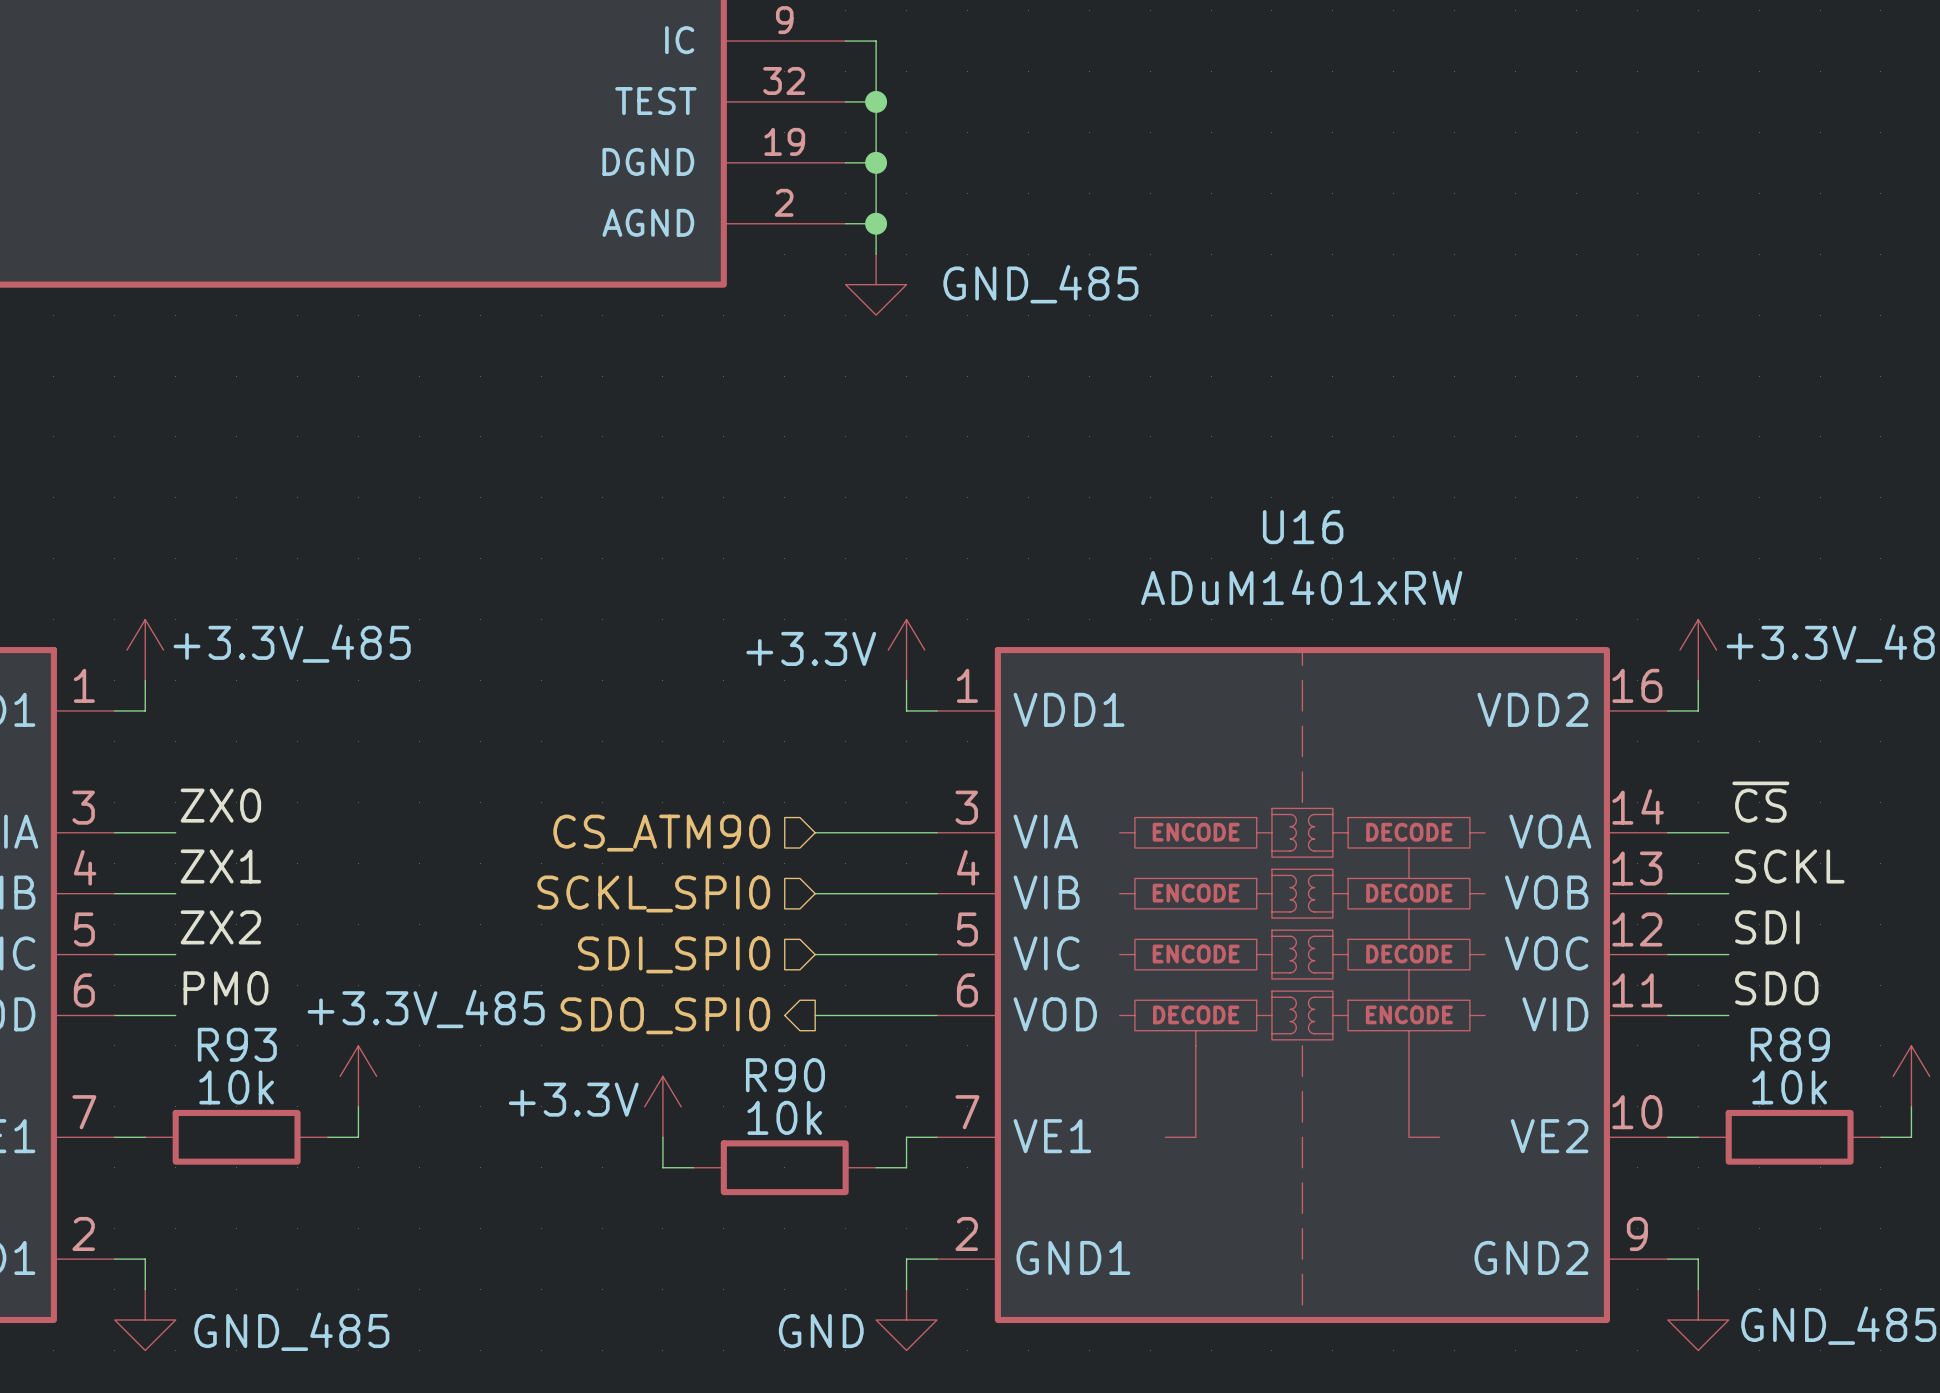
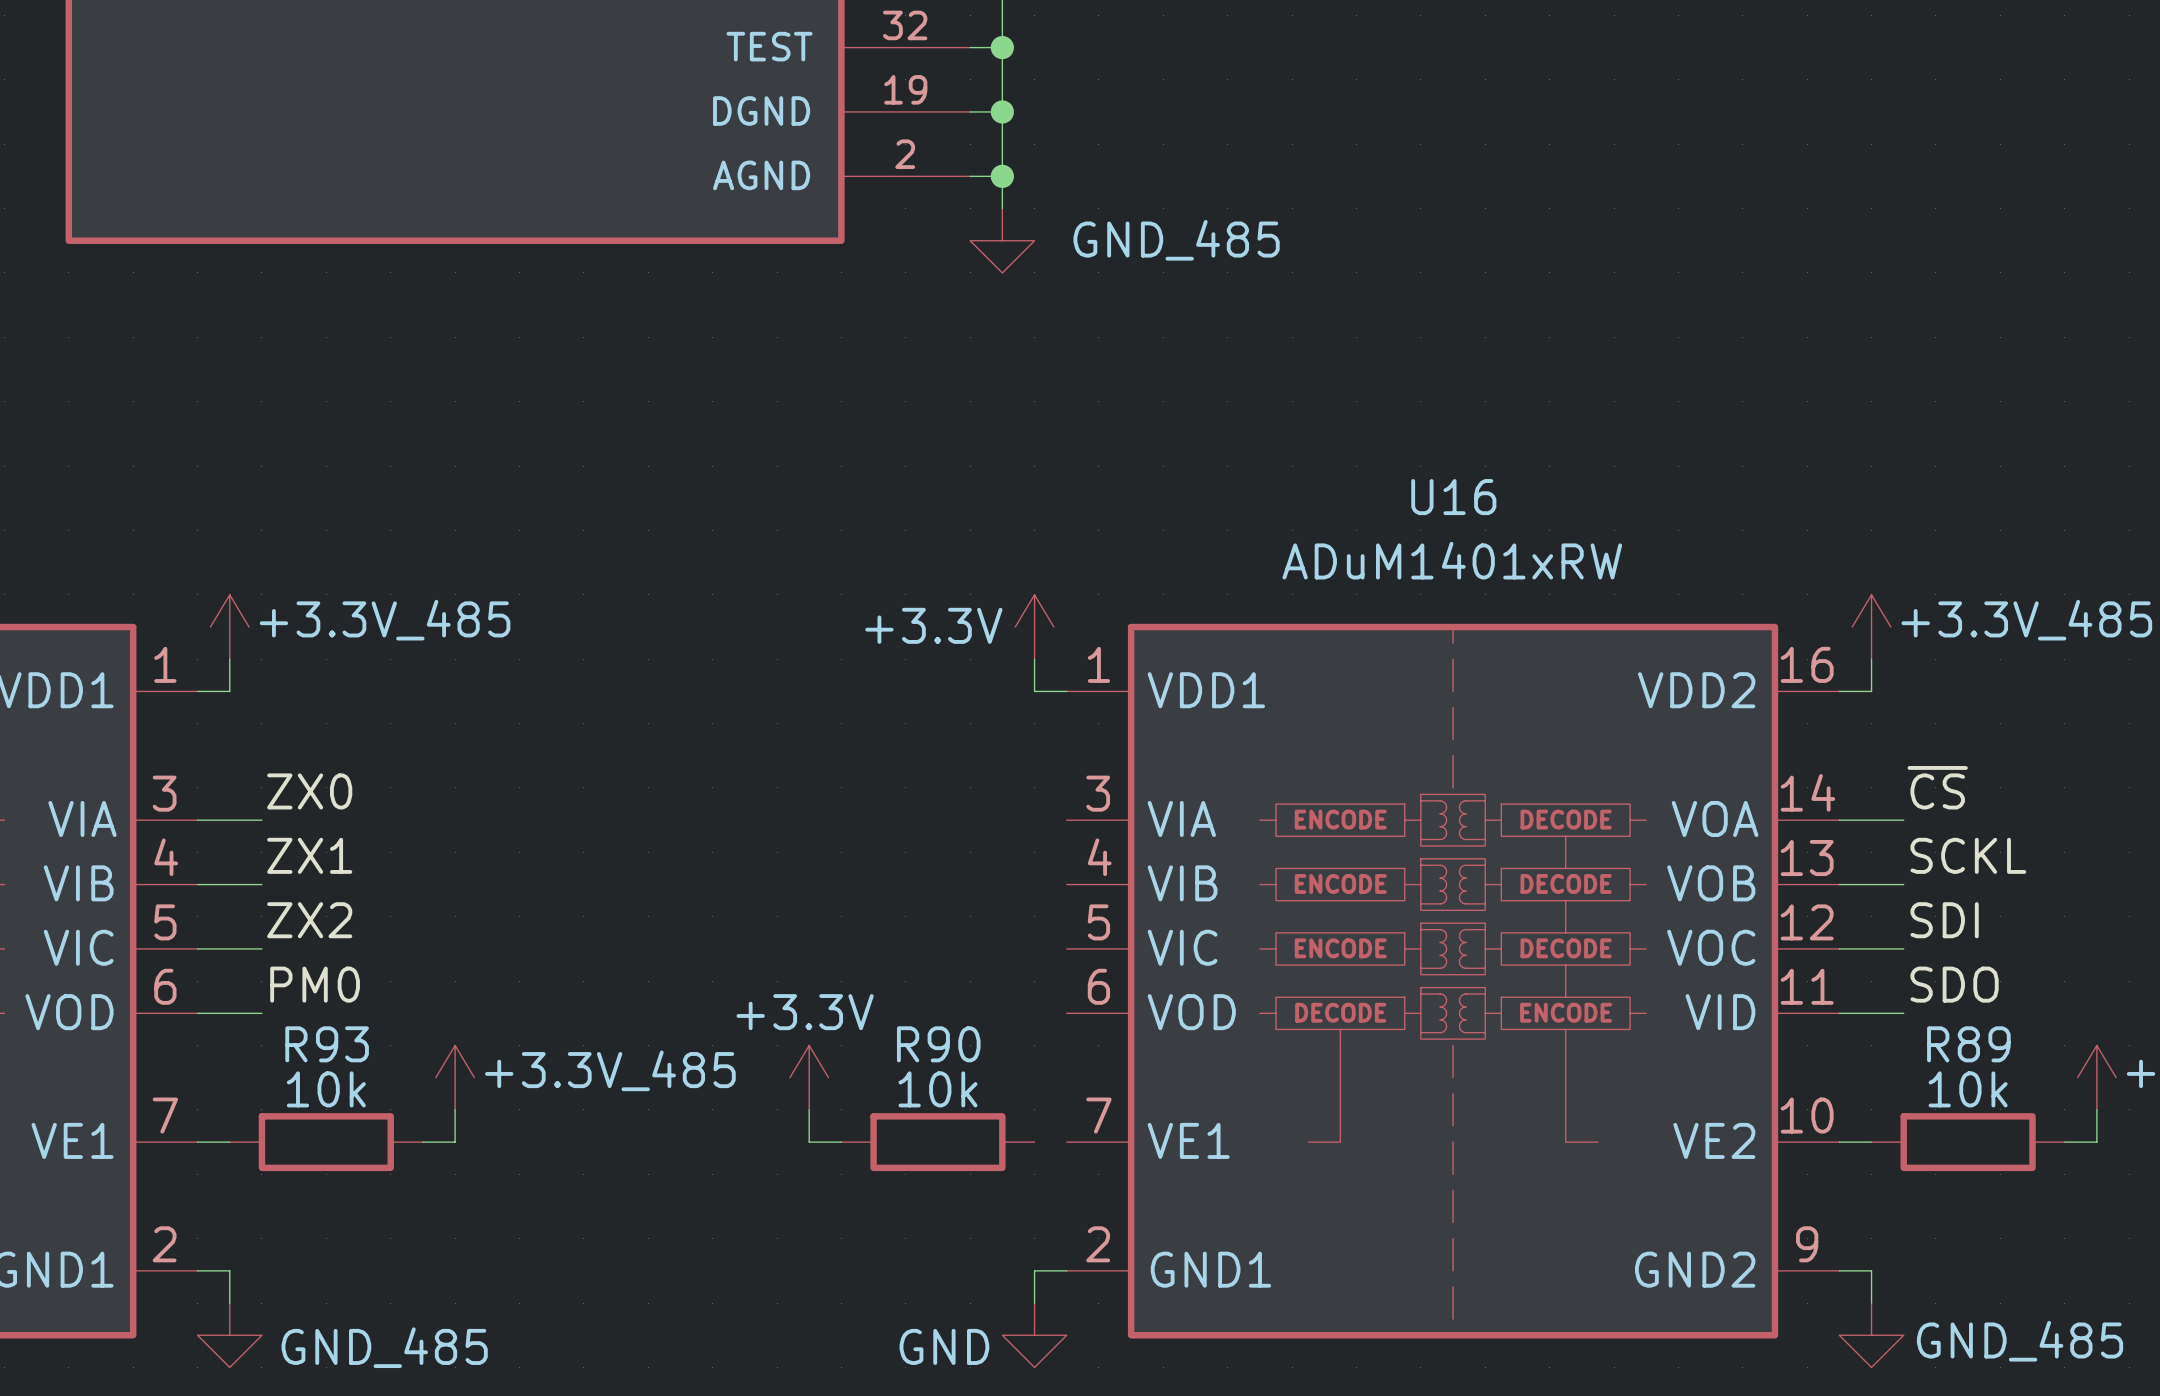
wire: (815, 832) (936, 832) -> none
hierarchical label: CS_ATM90 (661, 833) -> none
hierarchical label: SCKL_SPI0 (653, 893) -> none
wire: (815, 893) (936, 893) -> none
hierarchical label: SDI_SPI0 (674, 954) -> none
wire: (815, 954) (936, 954) -> none
power symbol text position: +3.3V_485 (426, 1008) -> +3.3V_485 (610, 1070)
hierarchical label: SDO_SPI0 (665, 1015) -> none
wire: (815, 1015) (936, 1015) -> none
power symbol text position: +3.3V (573, 1099) -> +3.3V (805, 1012)
power symbol position: +3.3V (662, 1106) -> +3.3V (809, 1077)
wire: (662, 1137) (662, 1167) (693, 1167) -> (809, 1109) (809, 1142) (841, 1142)
wire: (936, 1137) (906, 1137) (906, 1167) (876, 1167) -> none
R90 position: (784, 1167) -> (937, 1142)

